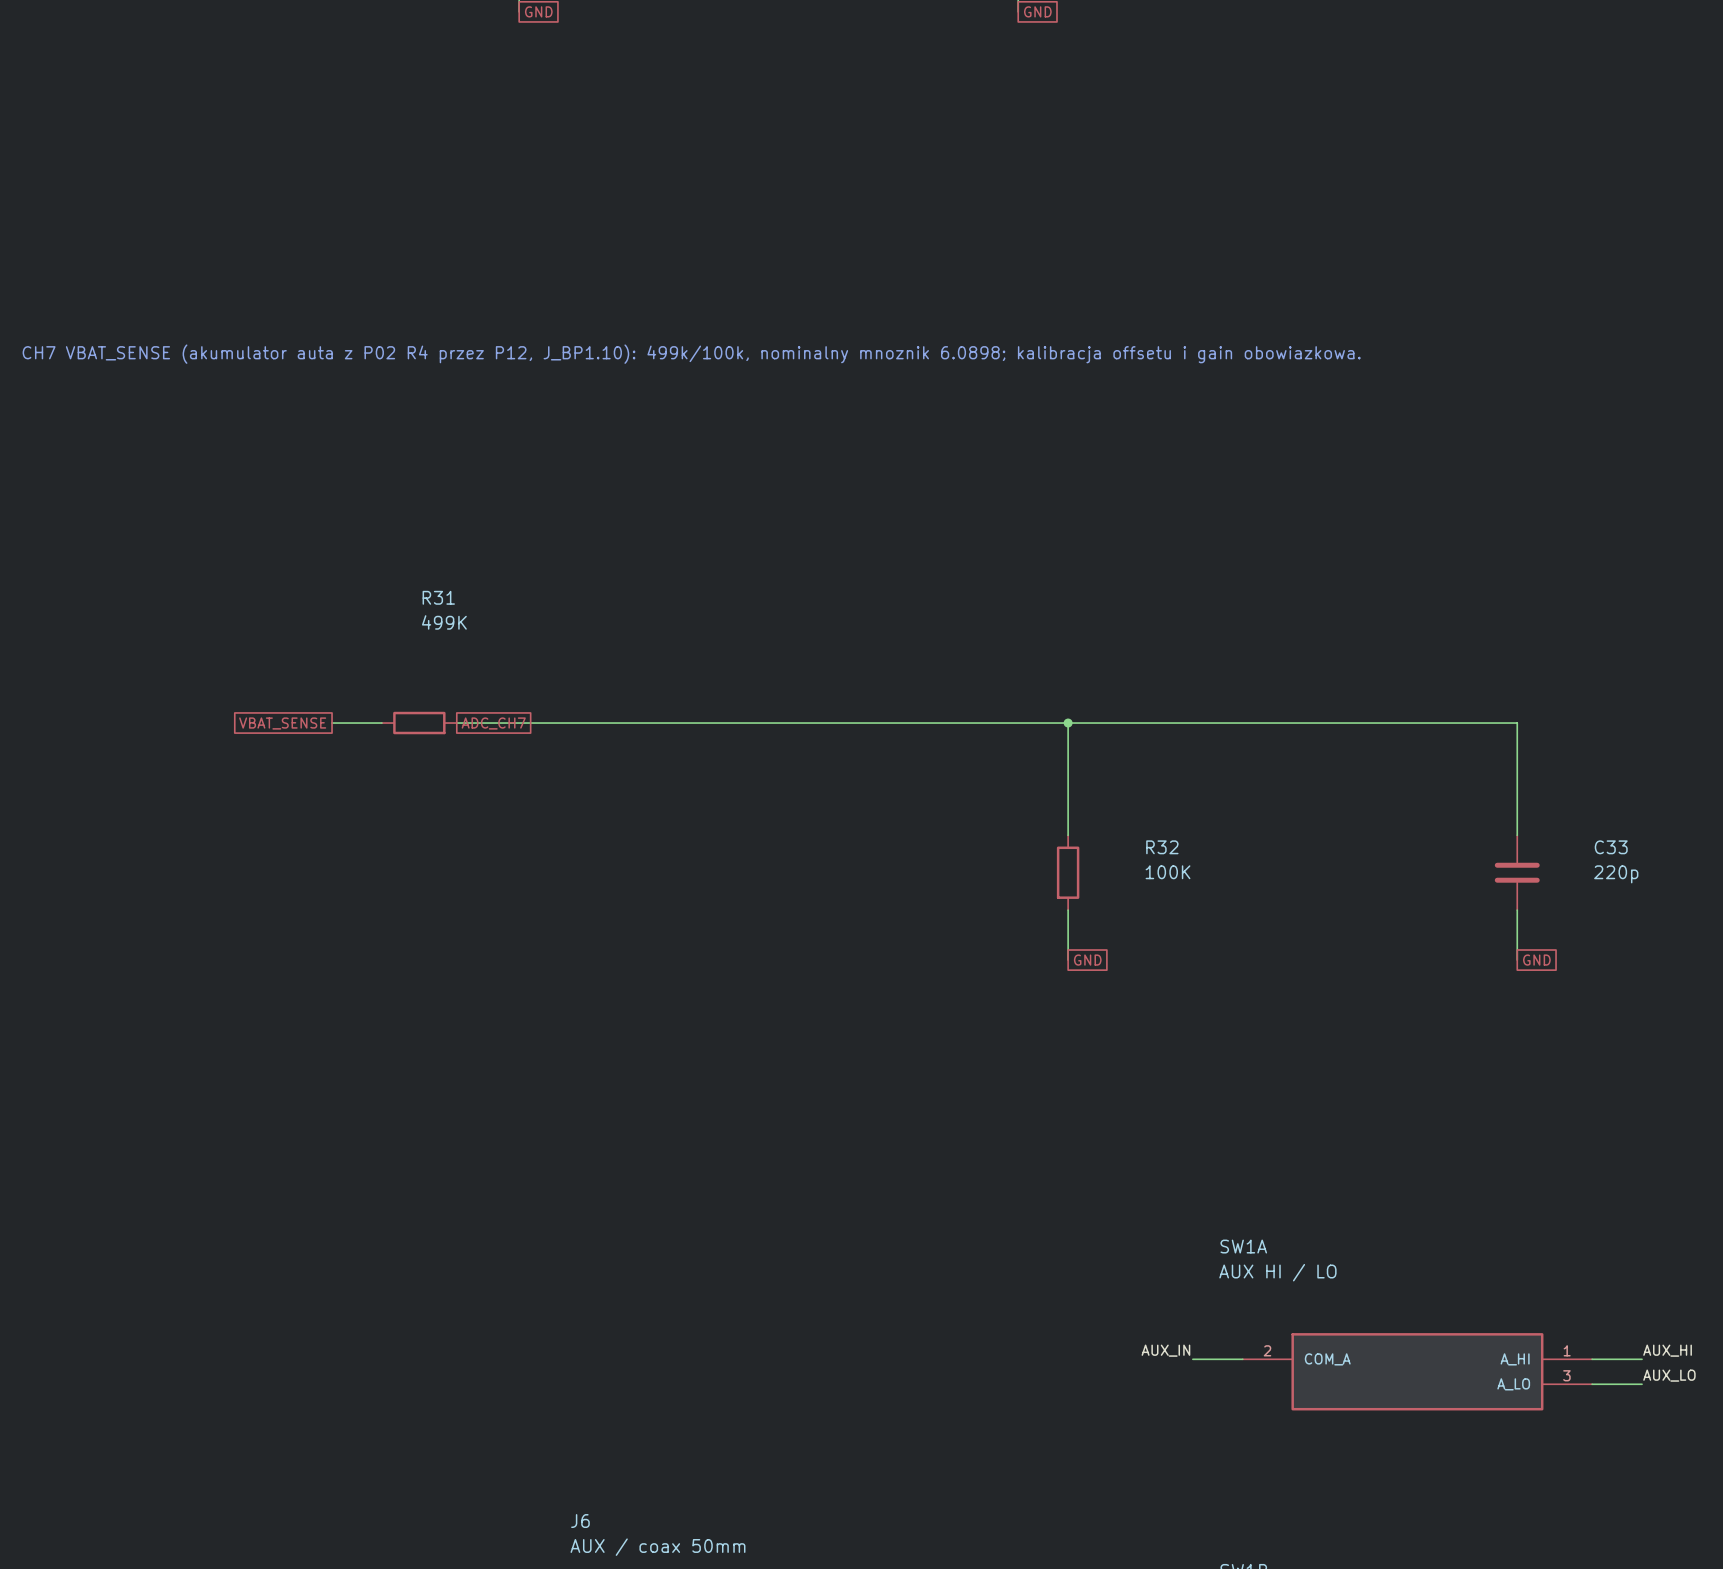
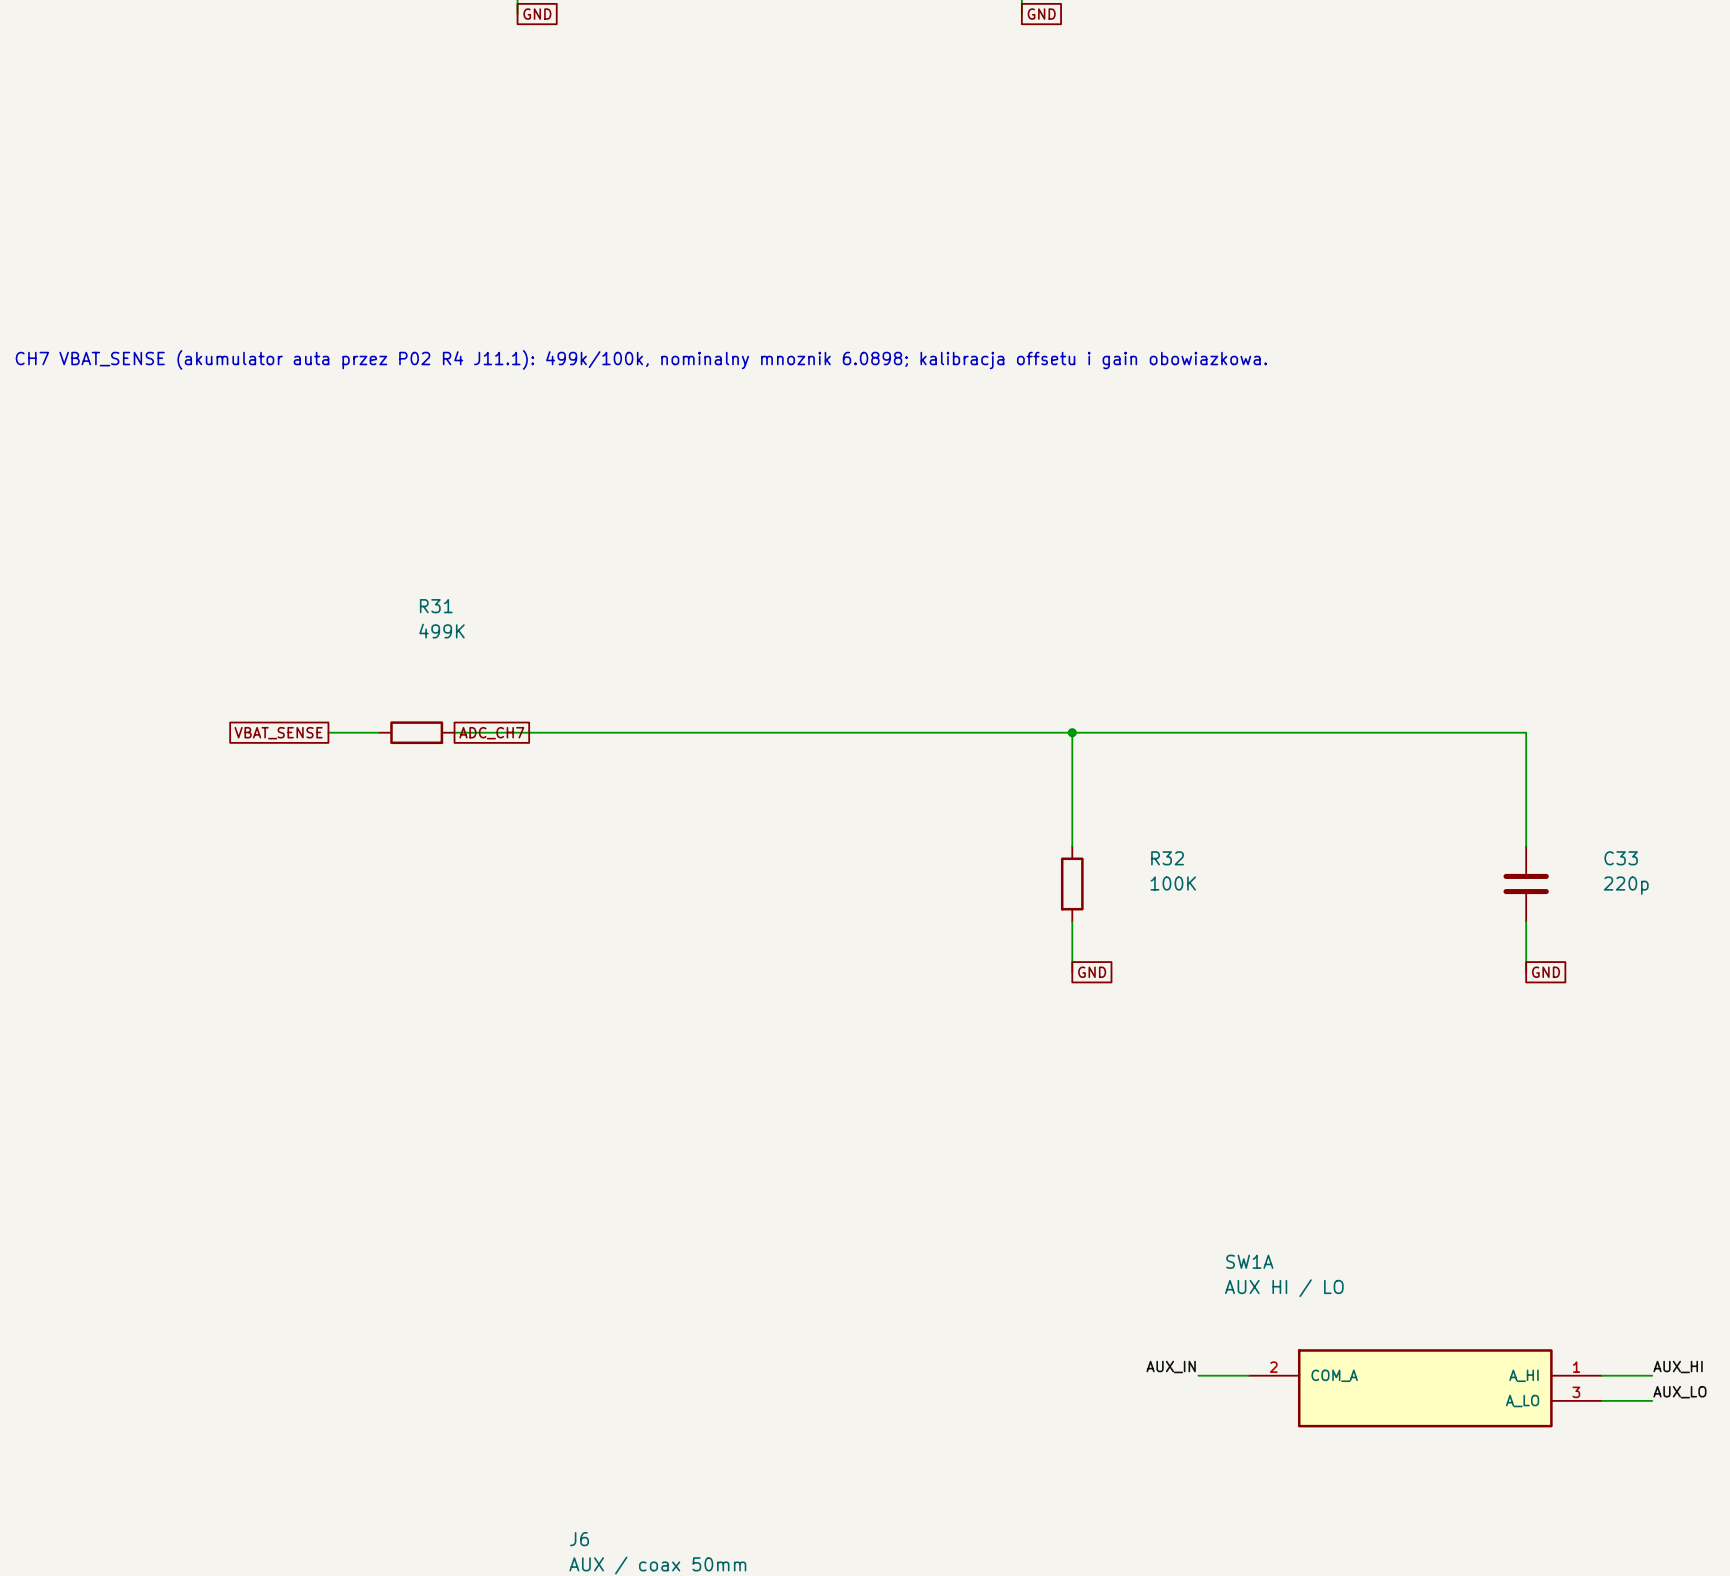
text: CH7 VBAT_SENSE (akumulator auta z P02 R4 przez P12, J_BP1.10): 499k/100k, nominalny mnoznik 6.0898; kalibracja offsetu i gain obowiazkowa. (691, 354) -> CH7 VBAT_SENSE (akumulator auta przez P02 R4 J11.1): 499k/100k, nominalny mnoznik 6.0898; kalibracja offsetu i gain obowiazkowa. (641, 359)

